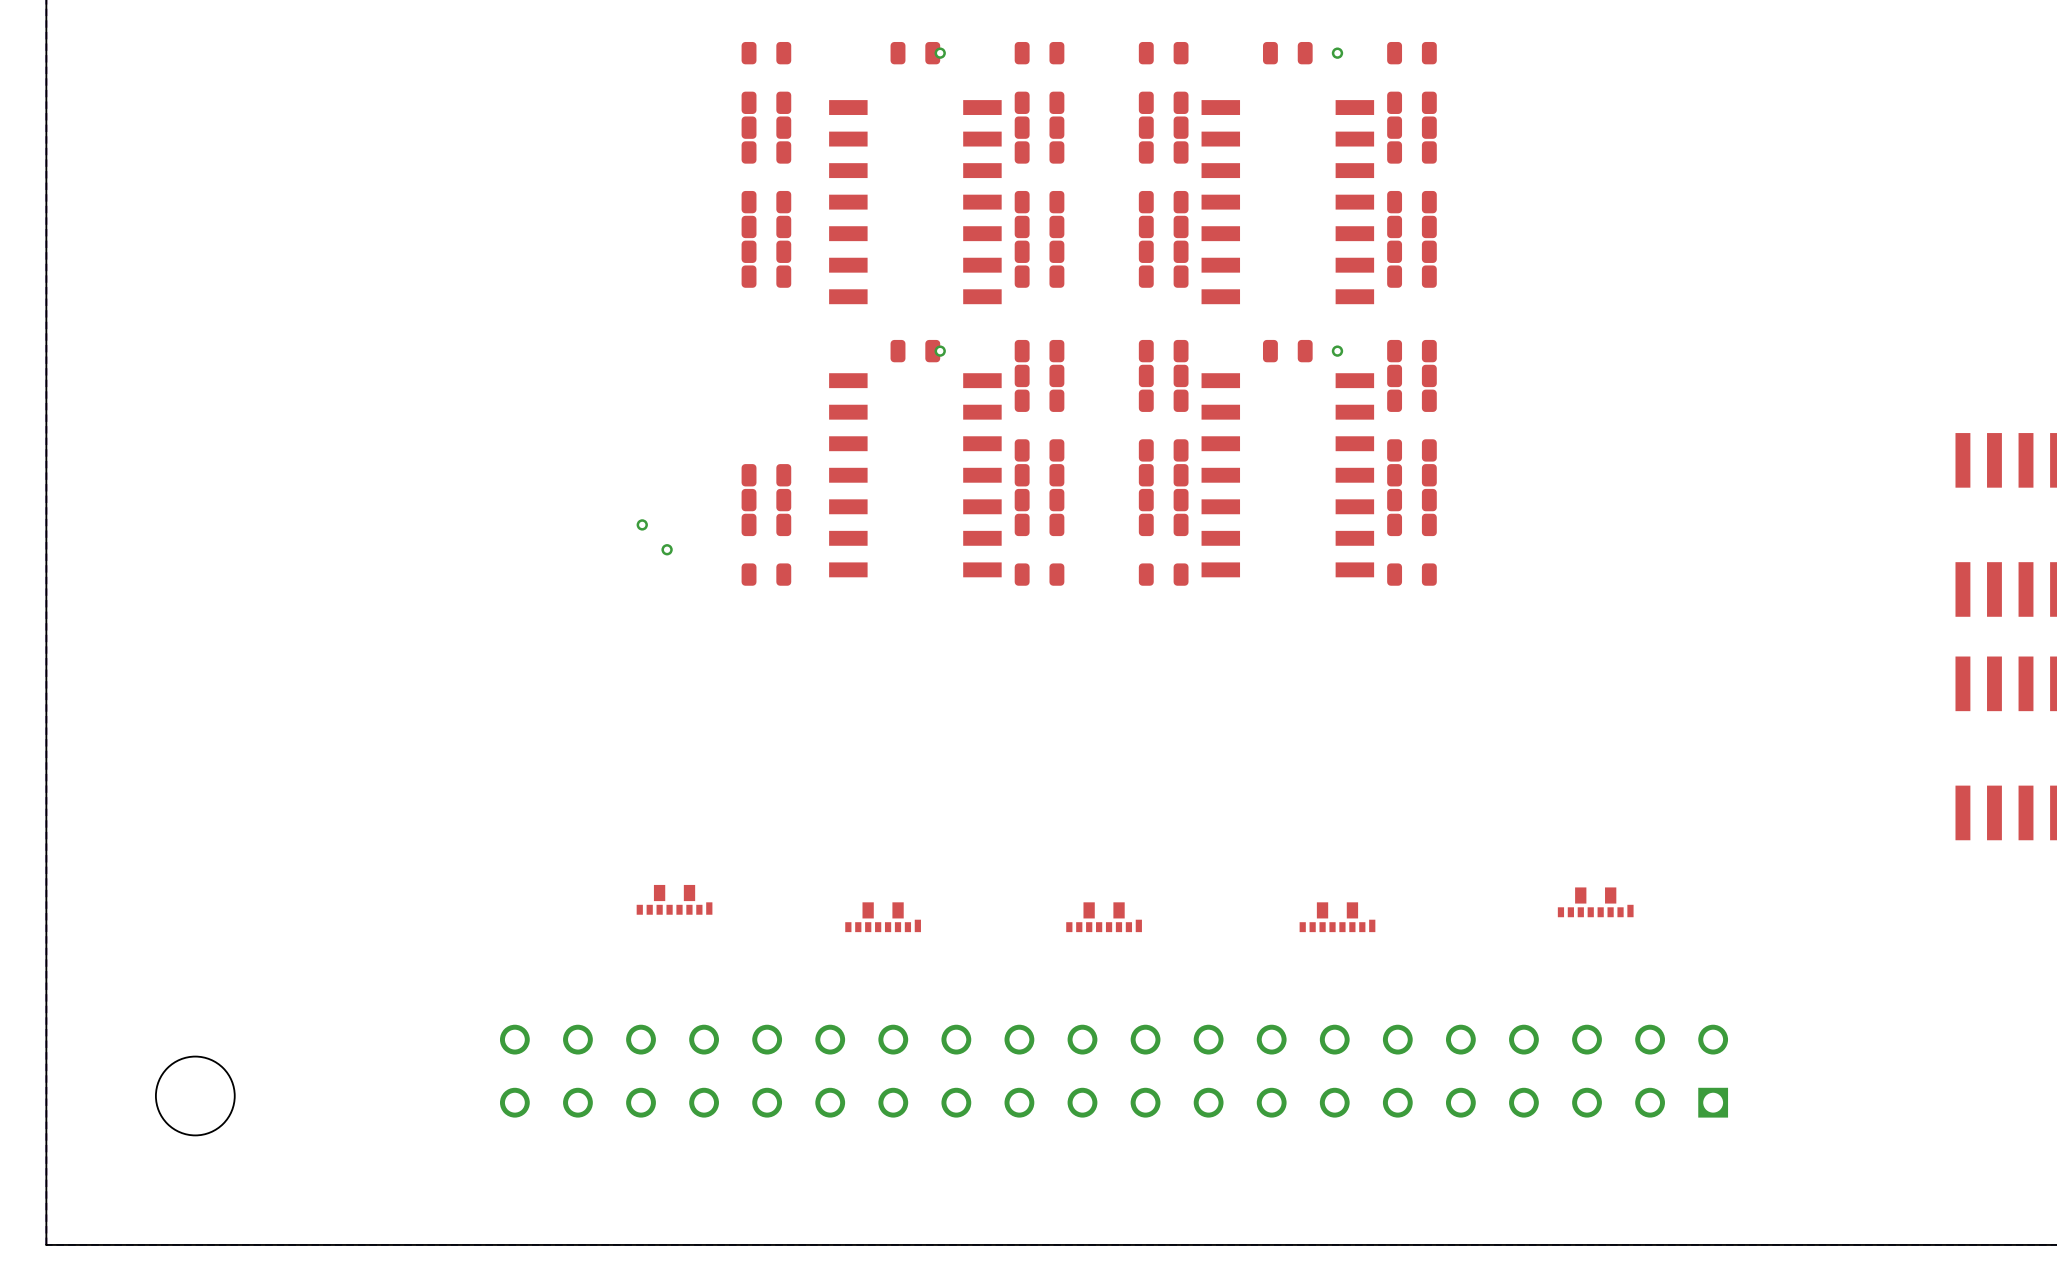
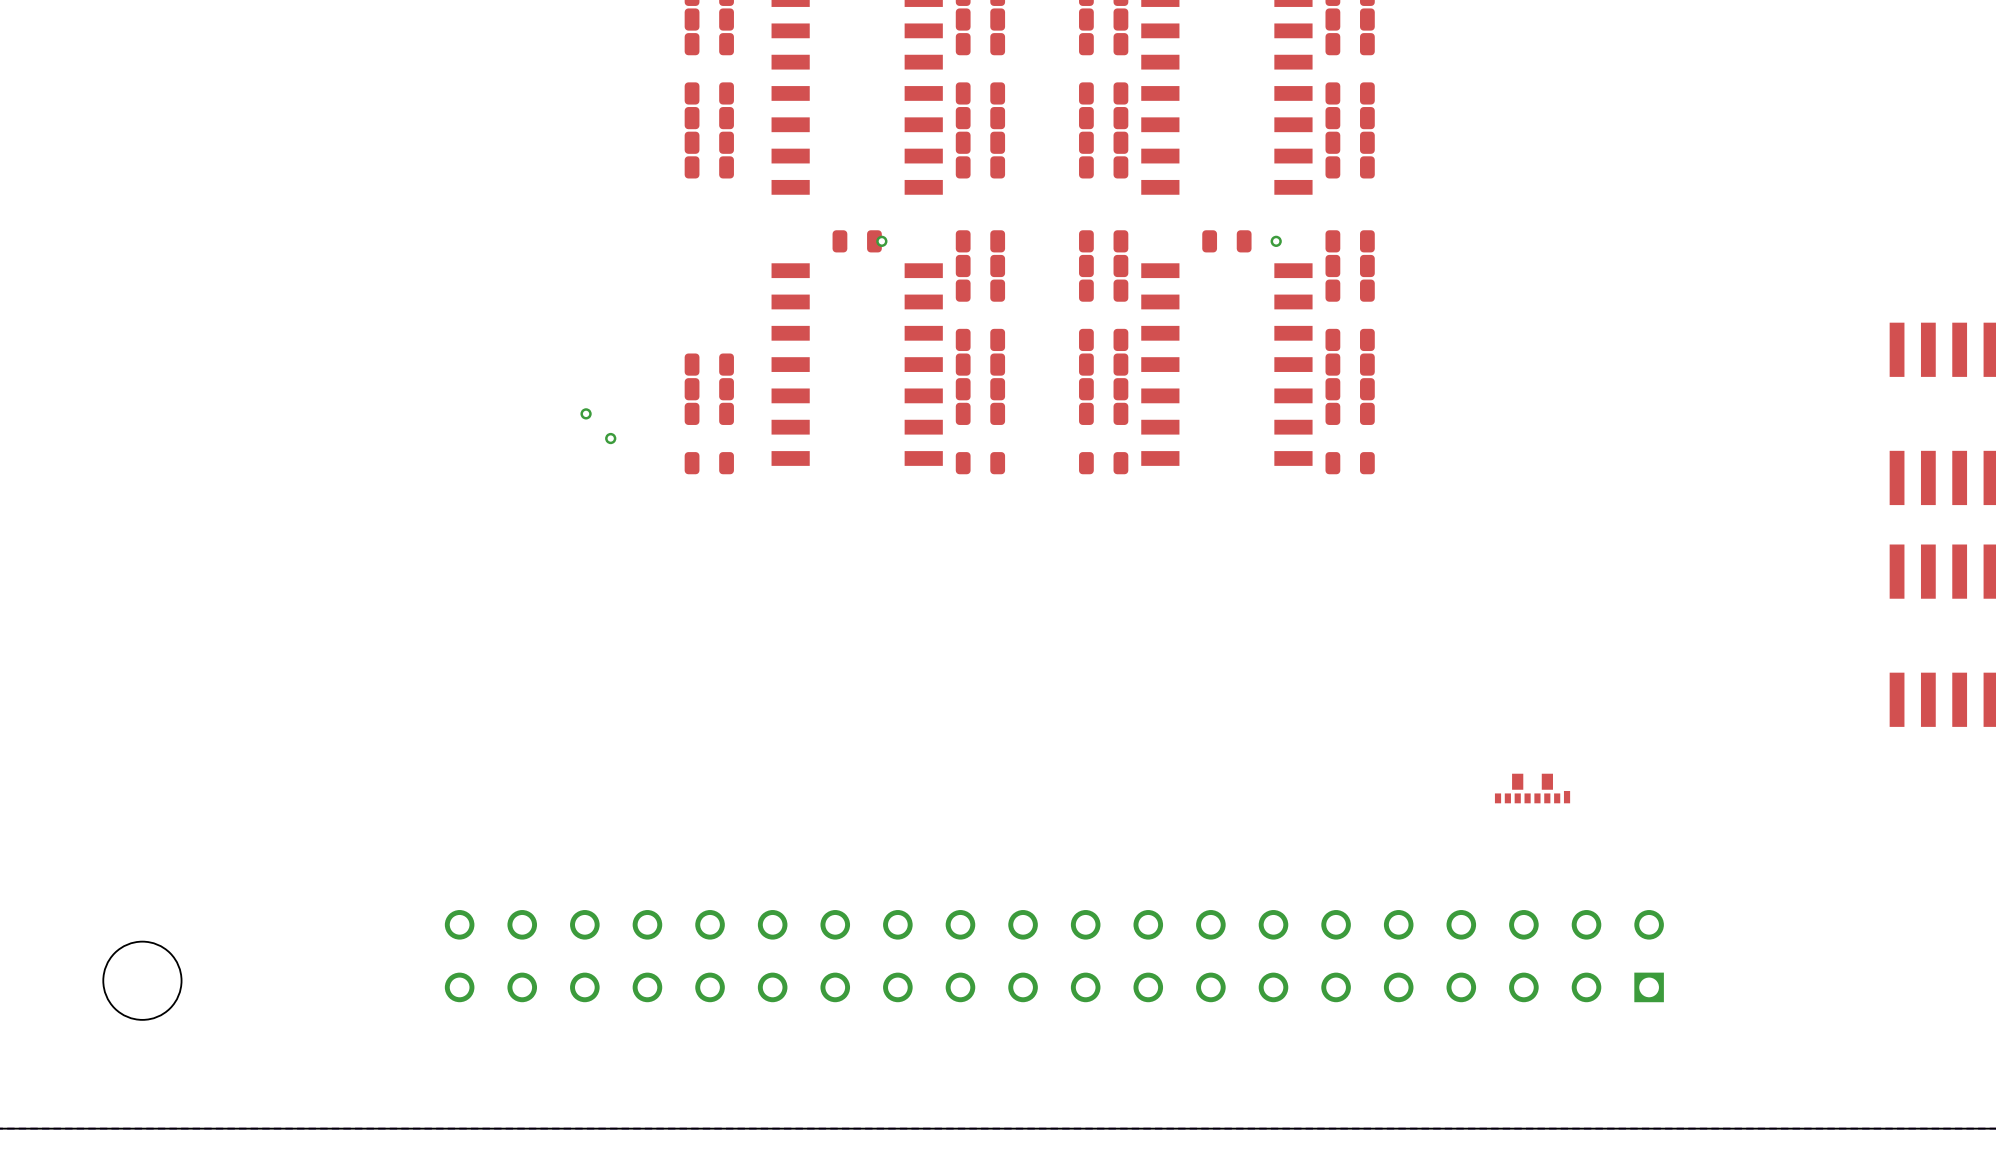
part: (674, 899) -> none
part: (883, 917) -> none
part: (1104, 917) -> none
part: (1337, 917) -> none

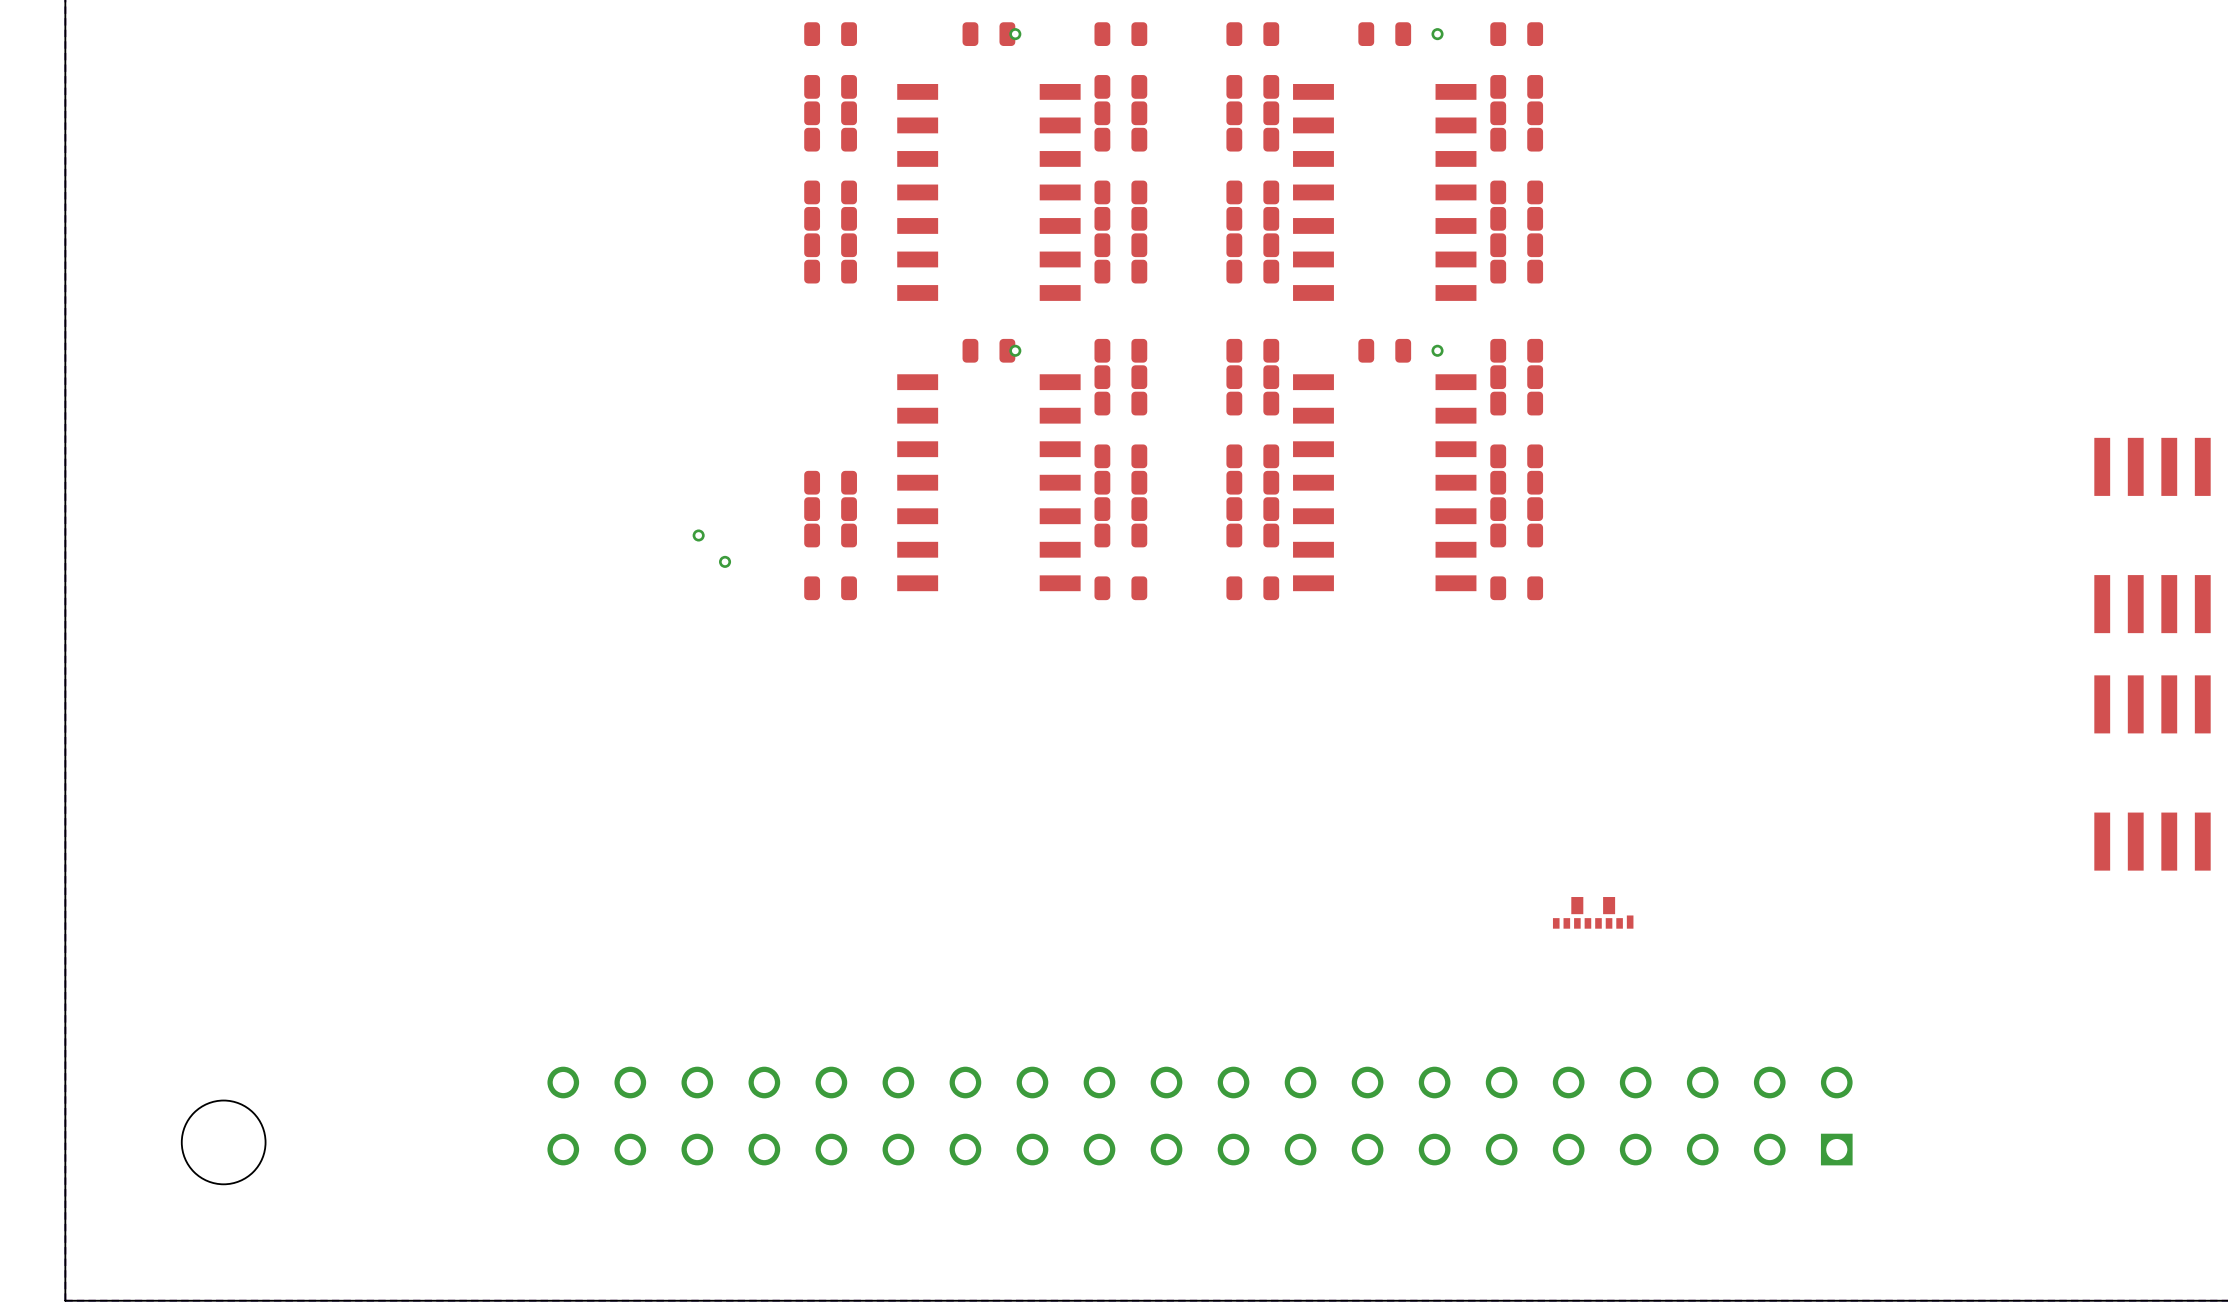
part position: (1532, 788) -> (1593, 912)

